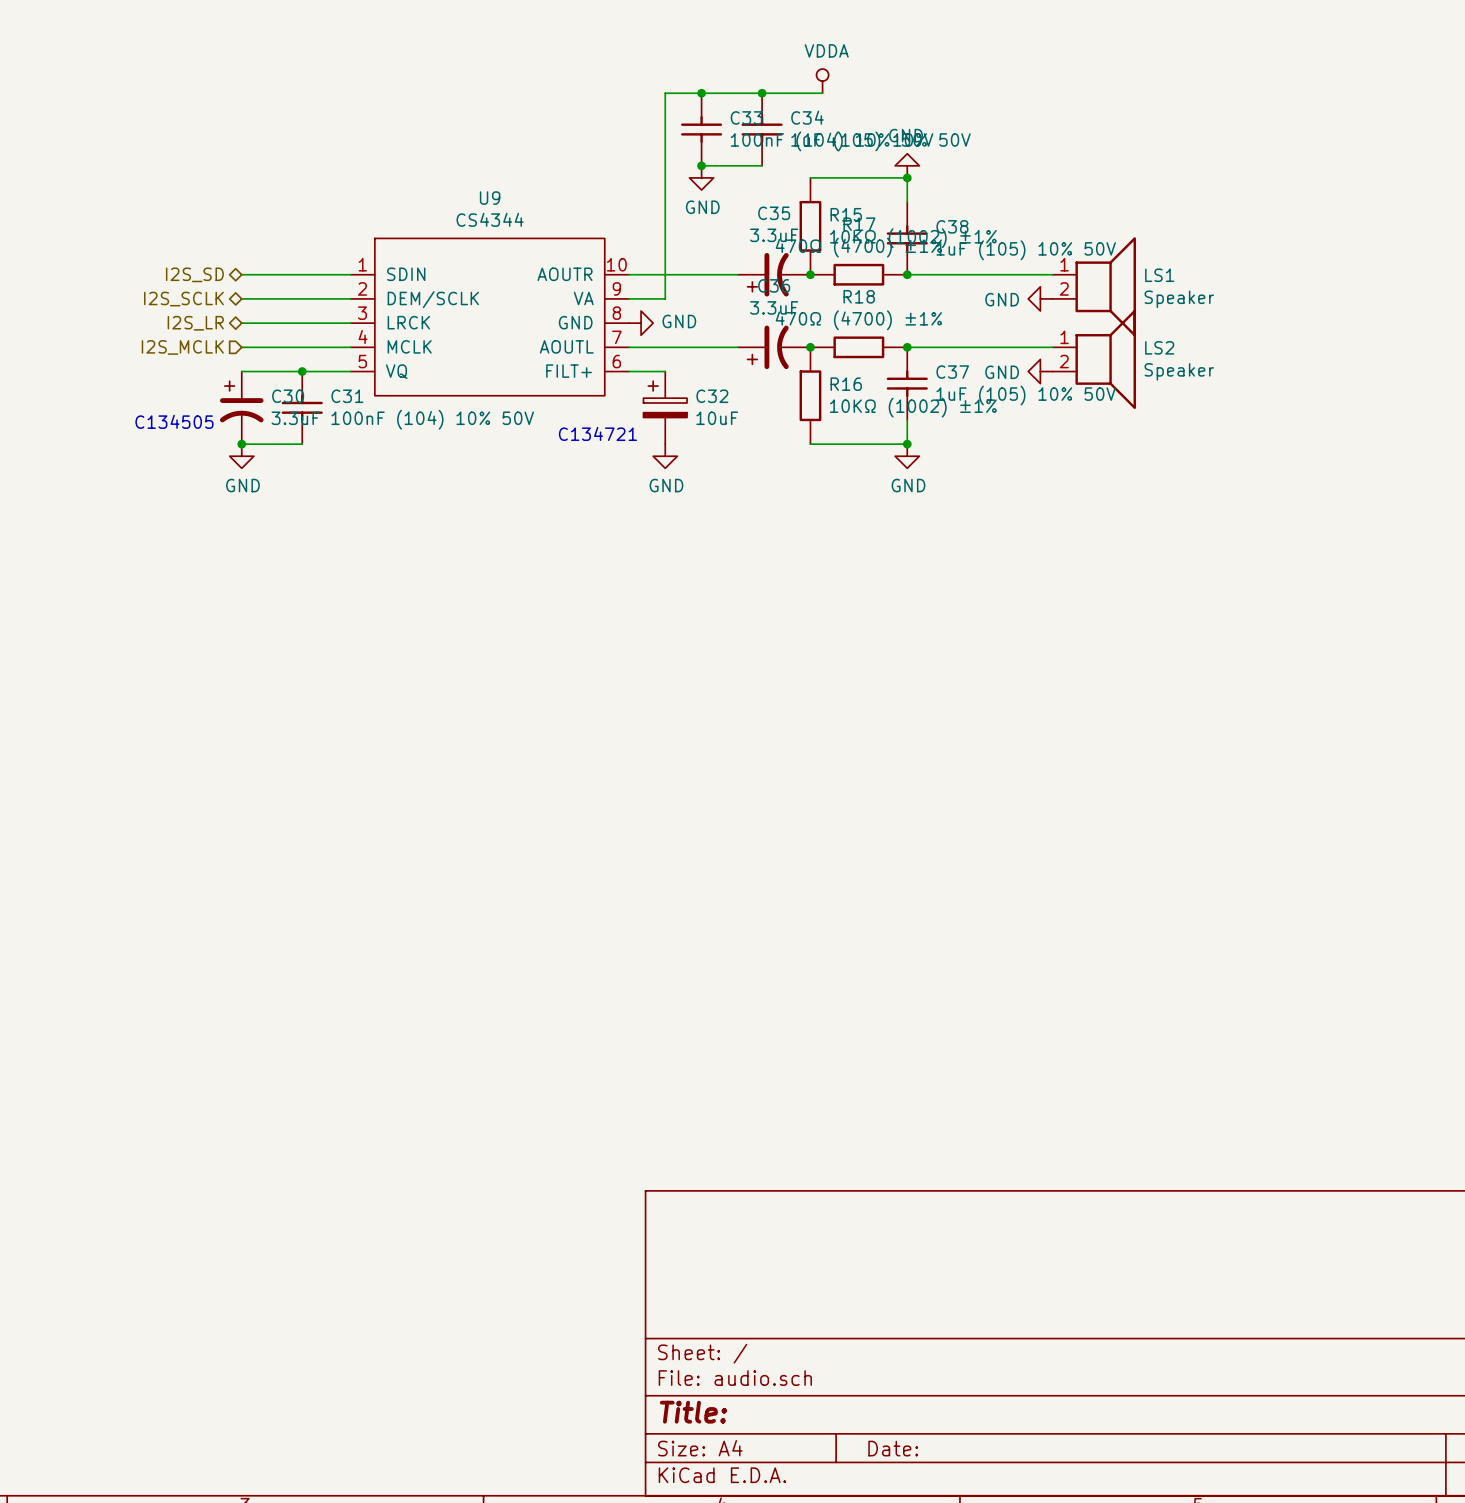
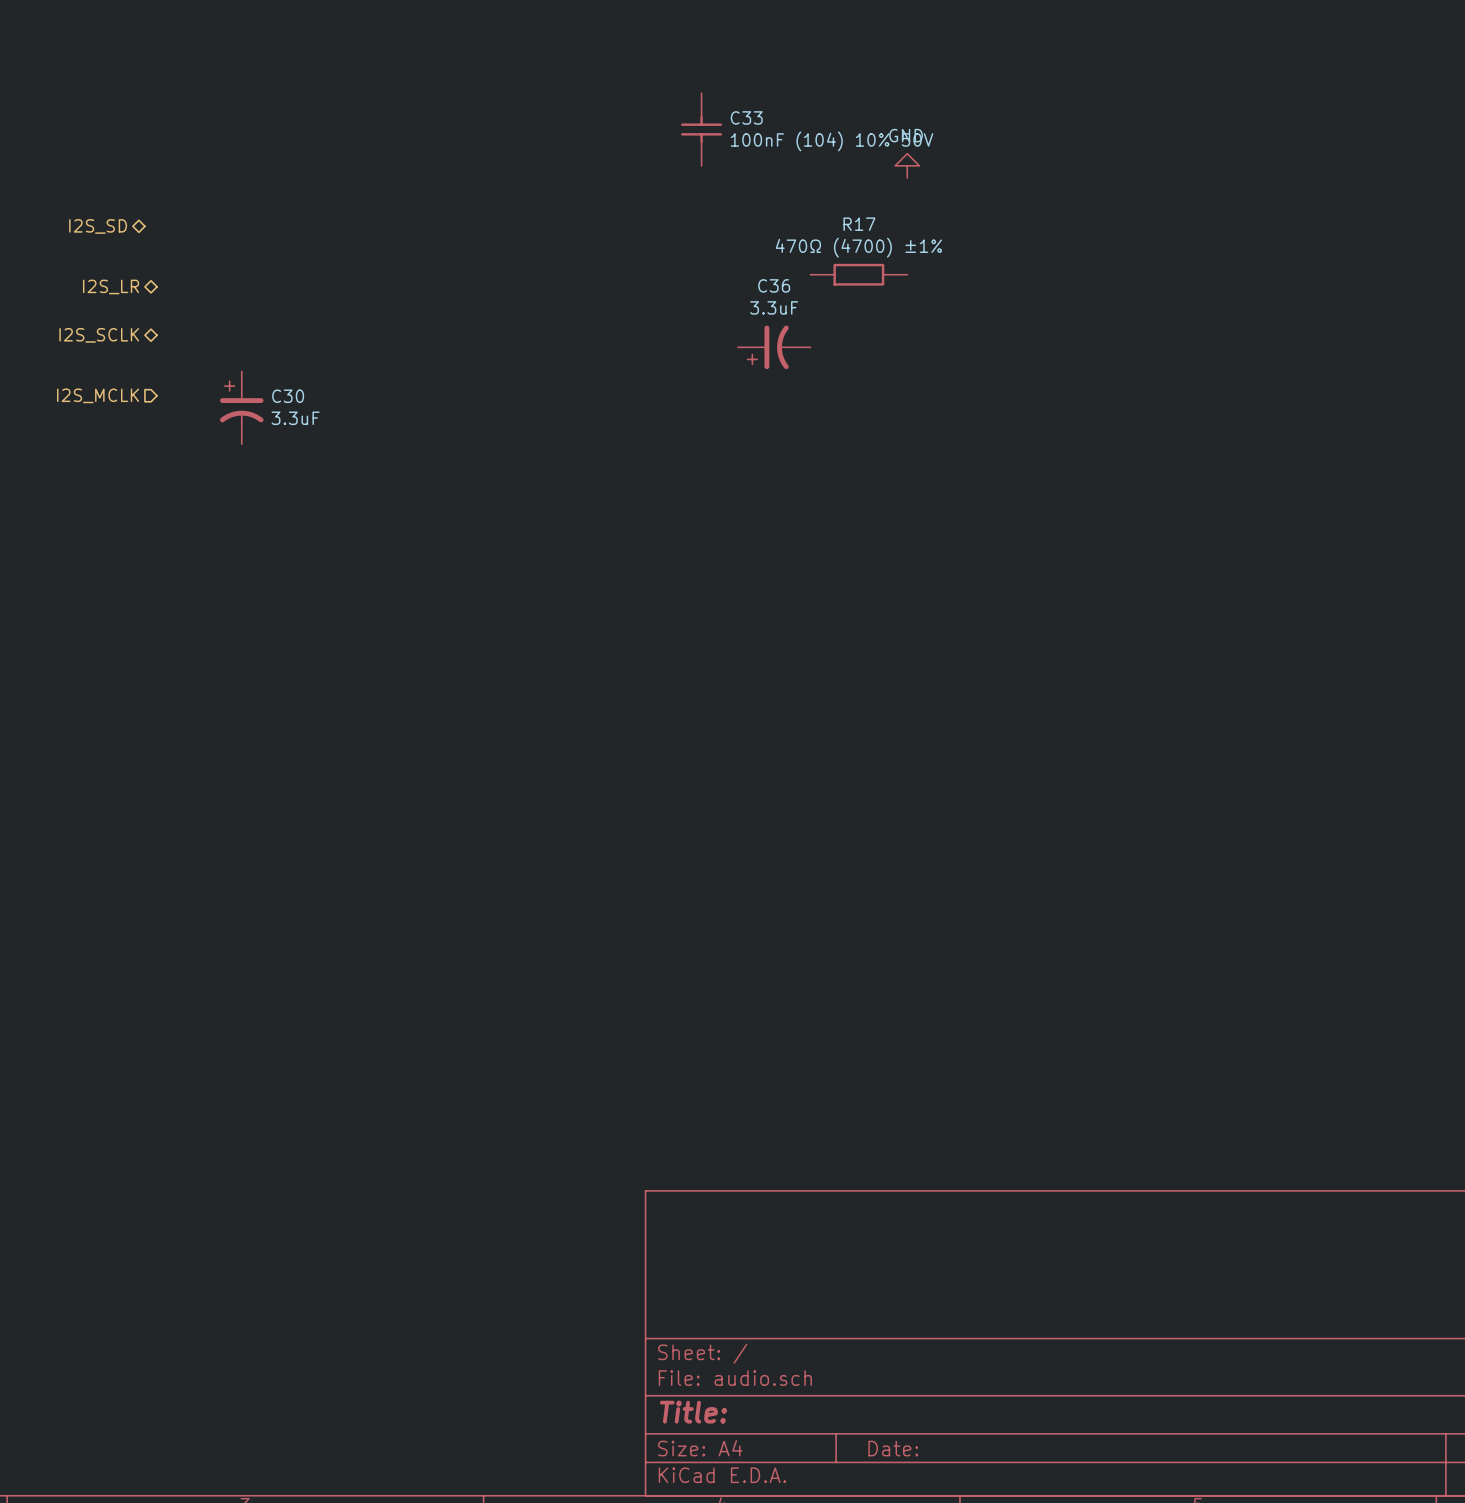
power symbol: VDDA (822, 81) -> none
junction: (701, 93) -> none
junction: (762, 93) -> none
wire: (822, 93) (665, 93) (665, 298) (628, 298) -> none
C34: (762, 129) -> none
wire: (701, 165) (762, 165) -> none
junction: (701, 165) -> none
power symbol: GND (701, 177) -> none
wire: (810, 177) (907, 177) (907, 202) -> none
junction: (907, 177) -> none
R15: (810, 226) -> none
C38: (907, 238) -> none
hierarchical label position: I2S_SD (194, 274) -> I2S_SD (98, 226)
wire: (241, 274) (350, 274) -> none
wire: (628, 274) (737, 274) -> none
C35: 3.3uF (774, 274) -> none
junction: (810, 274) -> none
wire: (907, 274) (1052, 274) -> none
junction: (907, 274) -> none
LS1: Speaker (1094, 286) -> none
wire: (241, 298) (350, 298) -> none
power symbol: GND (1040, 298) -> none
hierarchical label position: I2S_SCLK (183, 299) -> I2S_SCLK (99, 335)
U9: CS4344 (489, 317) -> none
hierarchical label position: I2S_LR (195, 323) -> I2S_LR (111, 286)
wire: (241, 323) (350, 323) -> none
power symbol: GND (641, 323) -> none
hierarchical label position: I2S_MCLK (182, 347) -> I2S_MCLK (98, 395)
wire: (241, 347) (350, 347) -> none
wire: (628, 347) (737, 347) -> none
junction: (810, 347) -> none
R18: (858, 347) -> none
wire: (907, 347) (1052, 347) -> none
junction: (907, 347) -> none
LS2: Speaker (1094, 359) -> none
wire: (241, 371) (350, 371) -> none
junction: (302, 371) -> none
wire: (628, 371) (665, 371) -> none
power symbol: GND (1040, 371) -> none
C37: (907, 383) -> none
R16: (810, 395) -> none
C31: (302, 407) -> none
C32: 10uF (665, 407) -> none
wire: (907, 419) (907, 444) (810, 444) -> none
text: C134505 (174, 421) -> none
text: C134721 (597, 433) -> none
wire: (241, 444) (302, 444) -> none
junction: (241, 444) -> none
junction: (907, 444) -> none
power symbol: GND (241, 456) -> none
power symbol: GND (665, 456) -> none
power symbol: GND (907, 456) -> none

